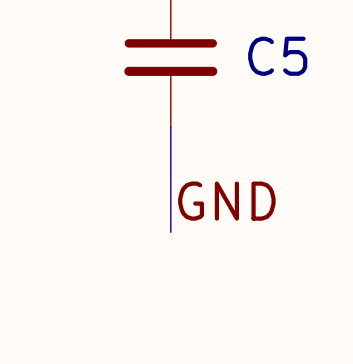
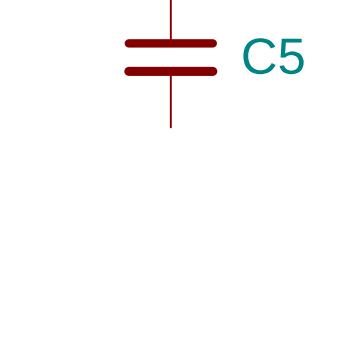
wire: (170, 127) (170, 232) -> none
label: GND (226, 201) -> none

